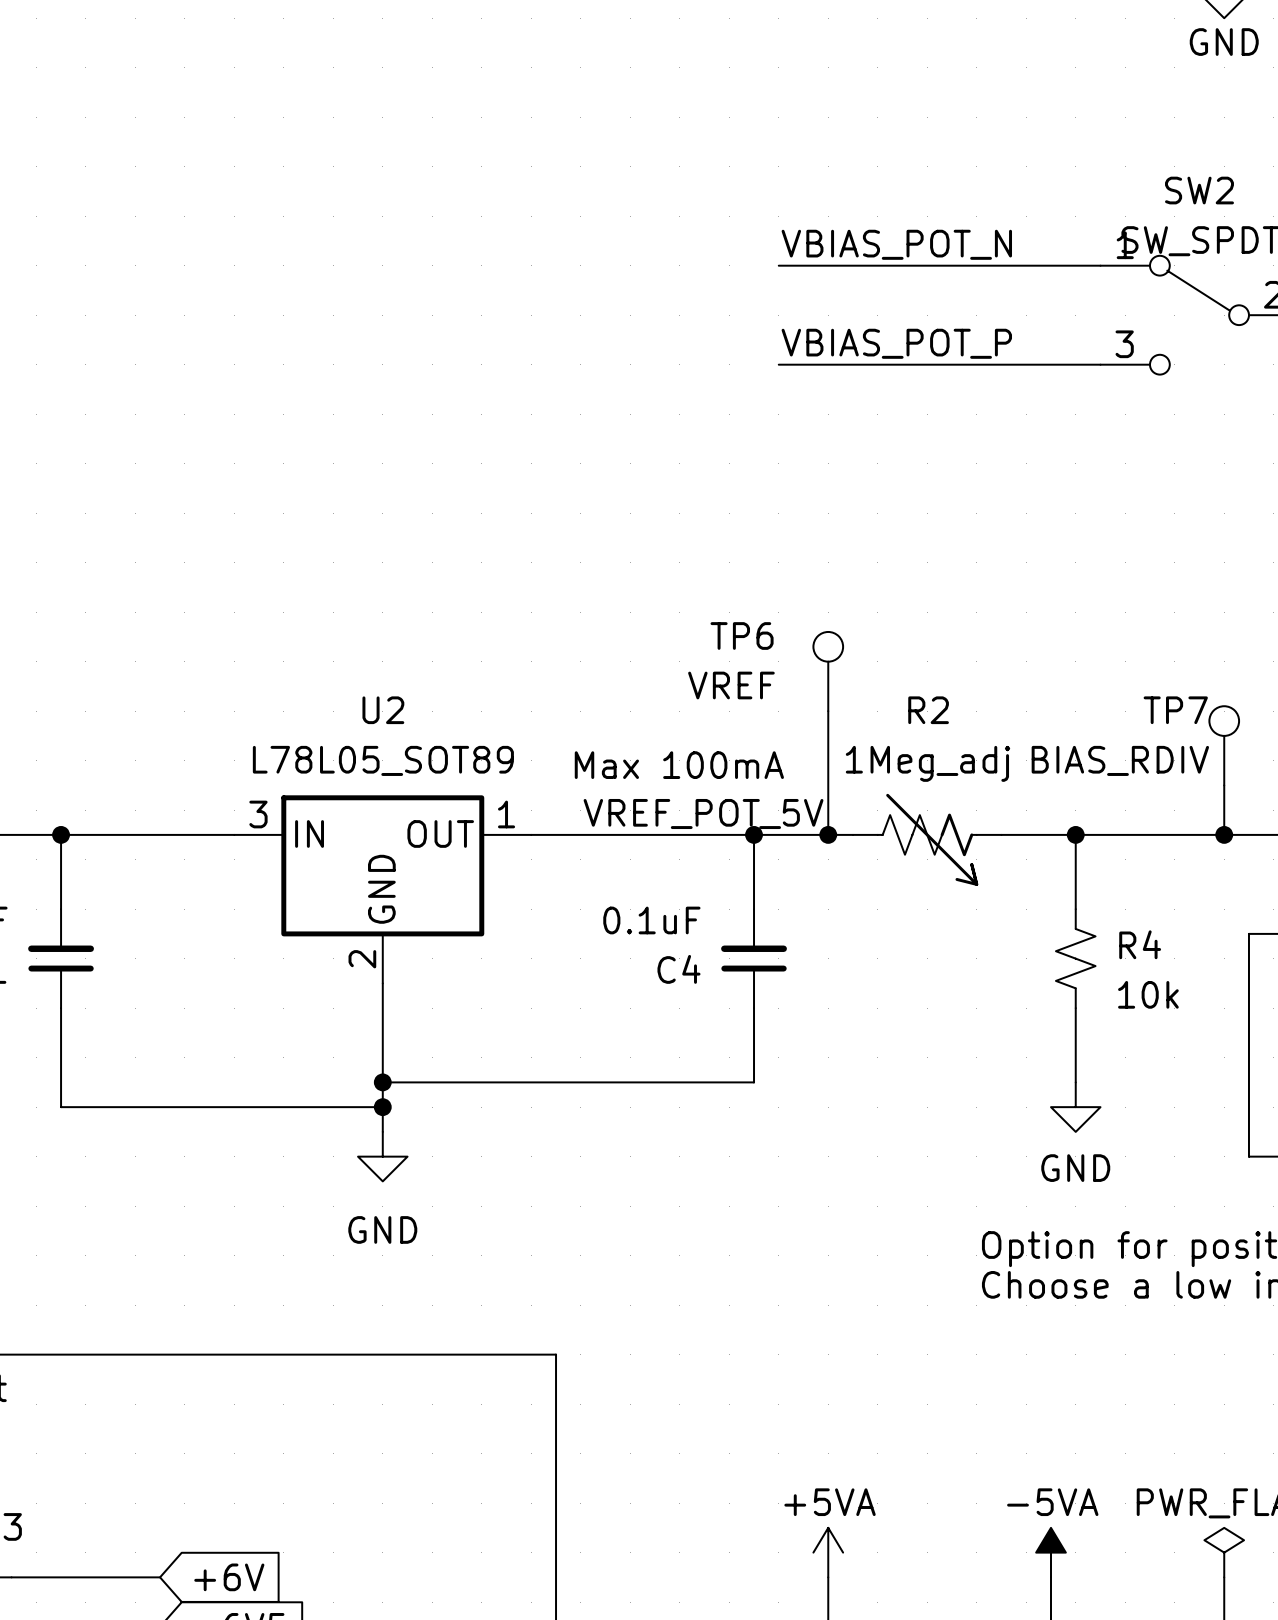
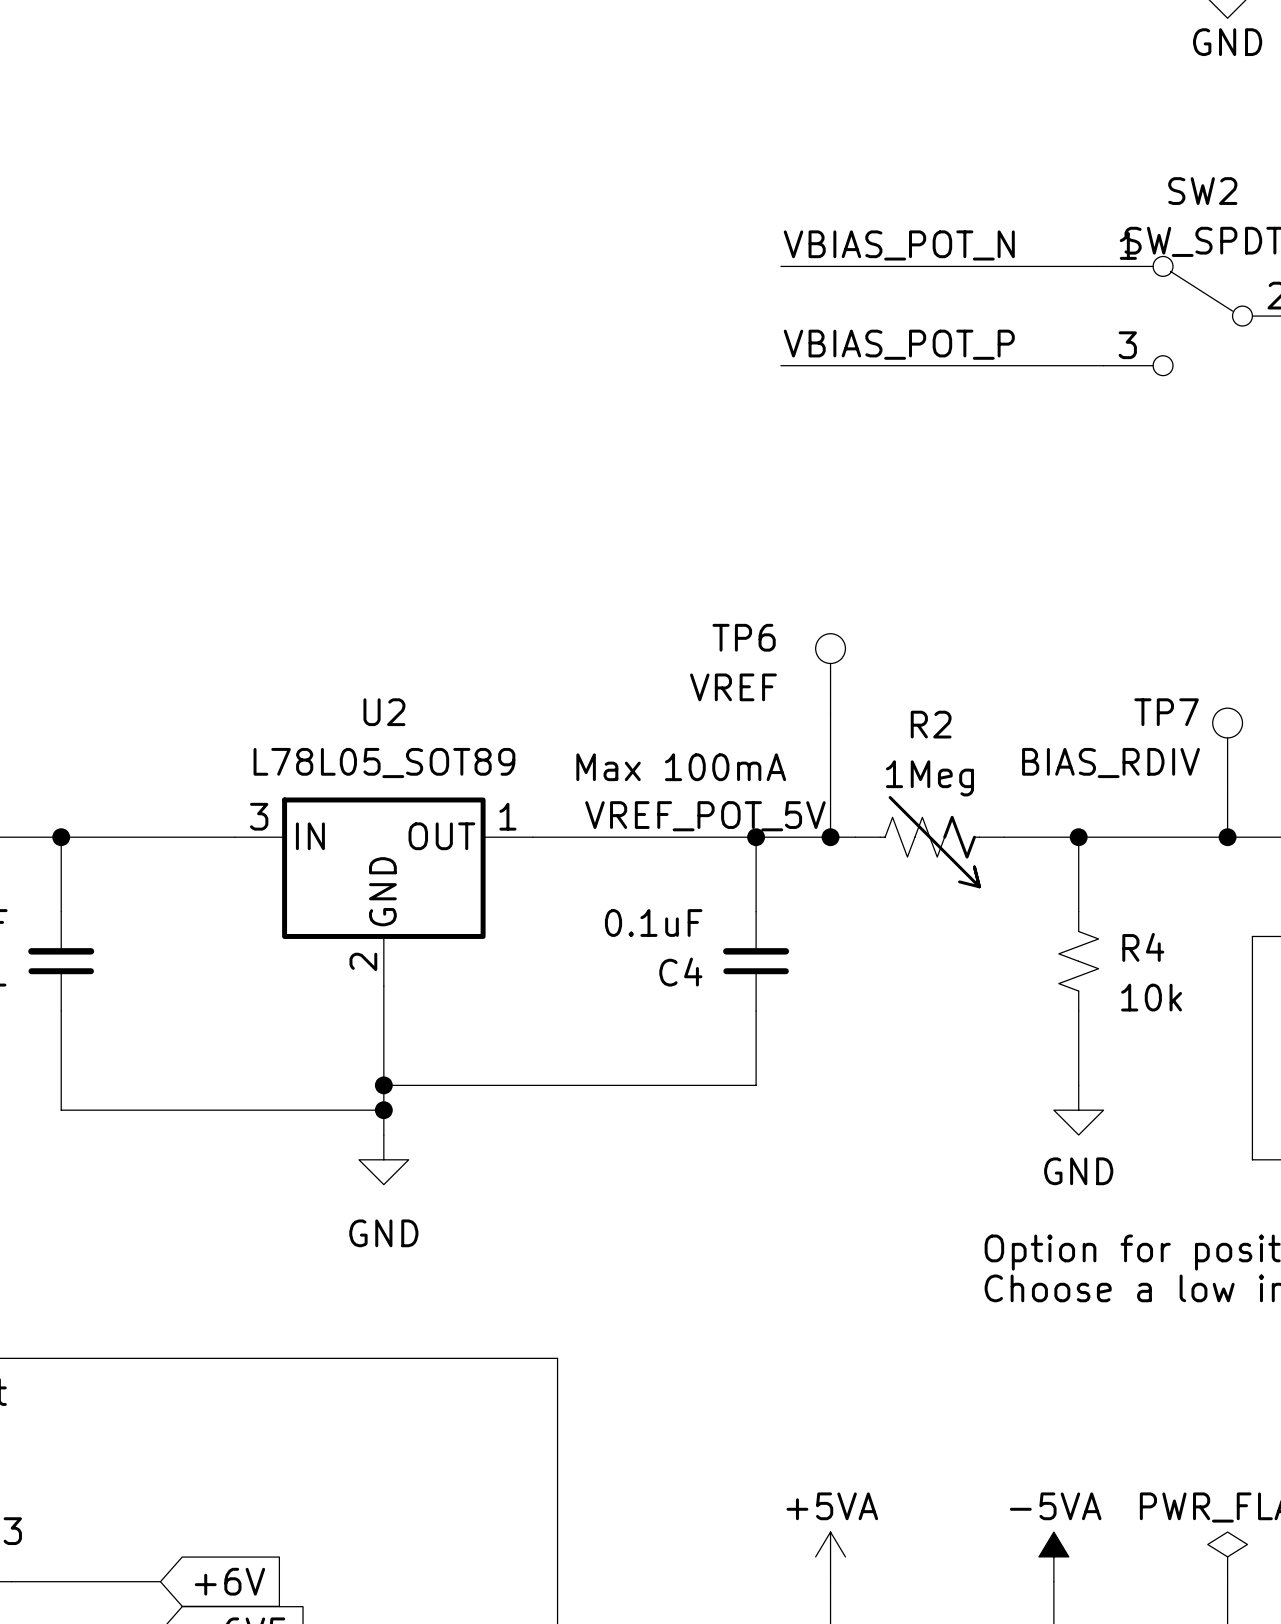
R2 name position: R2 (928, 710) -> R2 (931, 724)
TP7 name position: TP7 (1175, 710) -> TP7 (1166, 712)
TP7 value position: BIAS_RDIV (1120, 760) -> BIAS_RDIV (1111, 763)
R2 value: 1Meg_adj (928, 763) -> 1Meg (929, 778)

